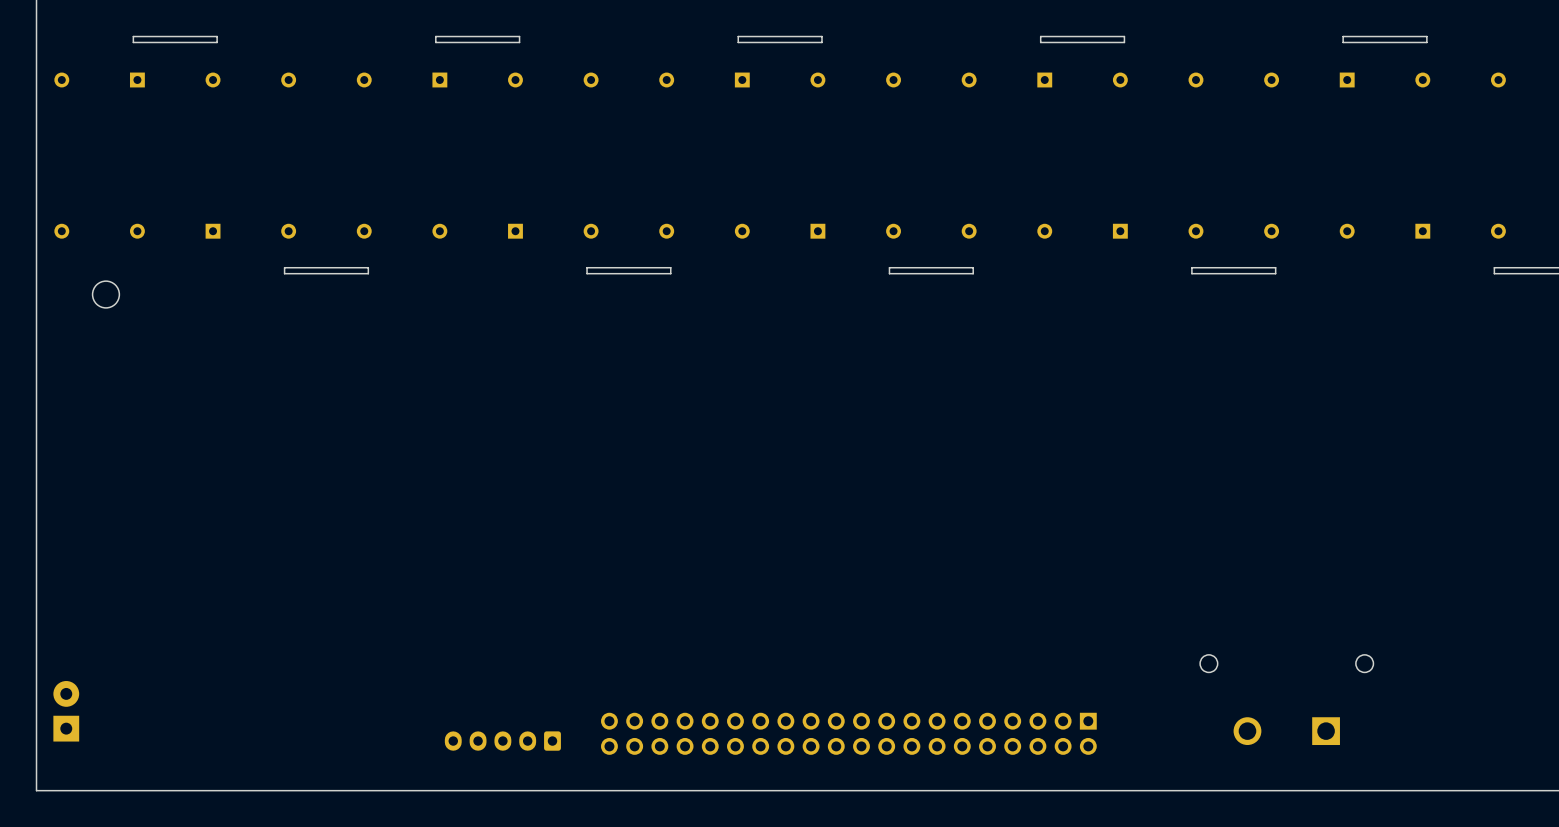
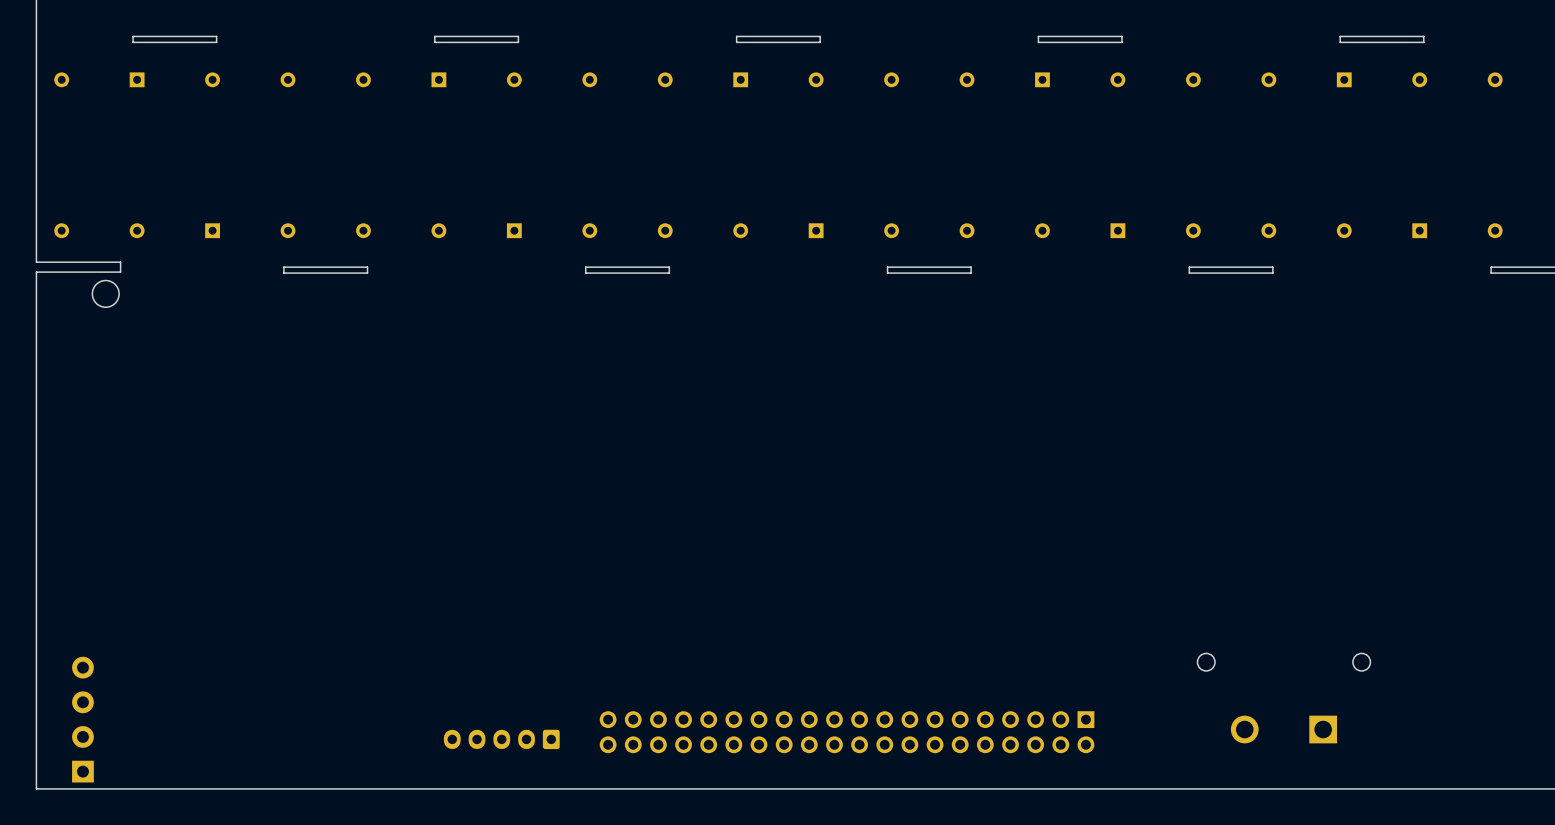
board edge: (36, 262) (36, 272) -> (36, 262) (120, 262) (120, 272) (36, 272)
part: (66, 711) -> none
part: none -> (82, 719)

